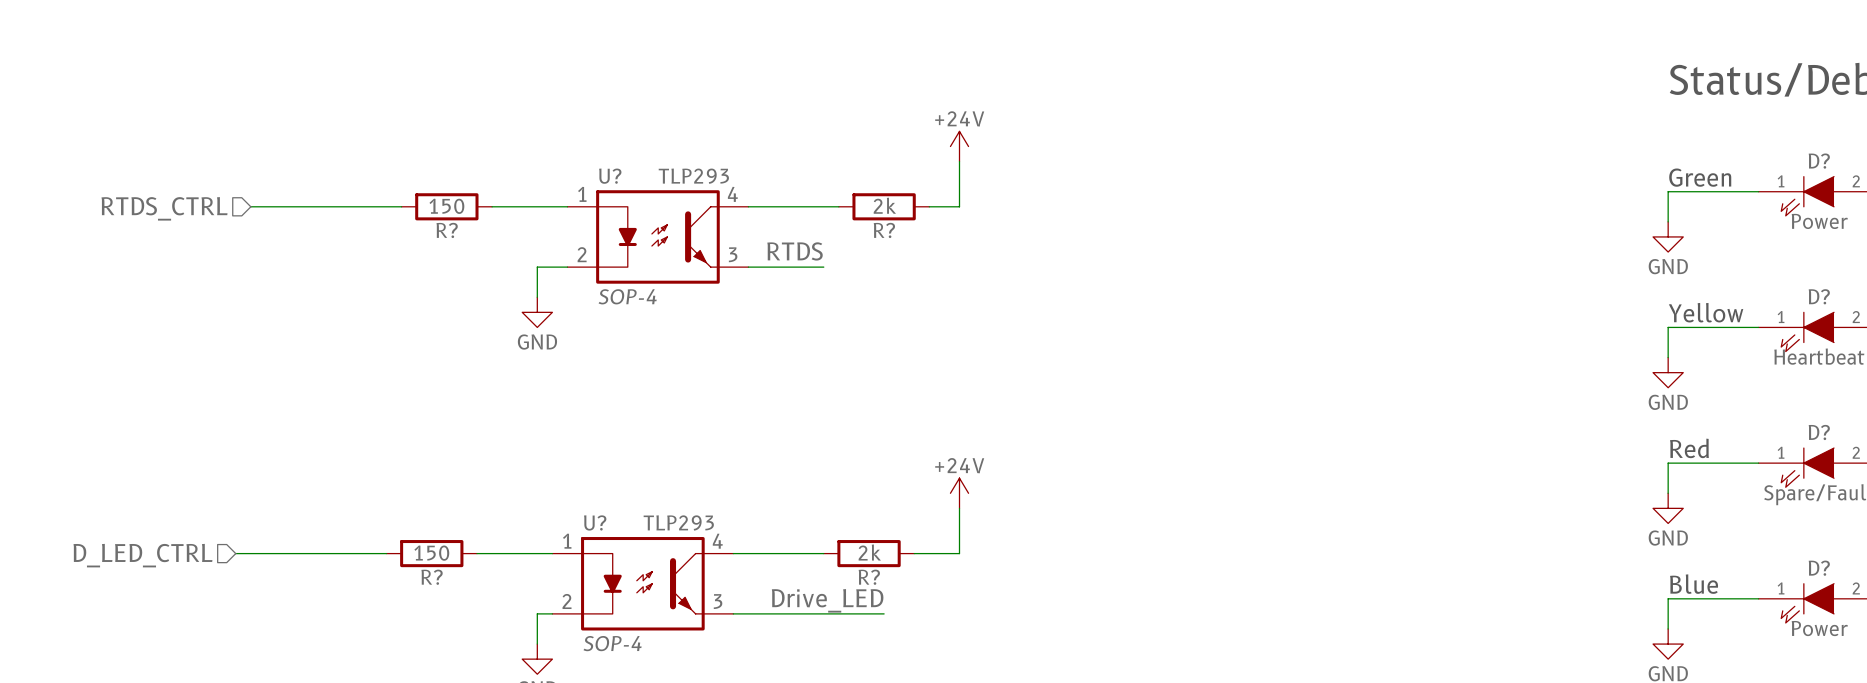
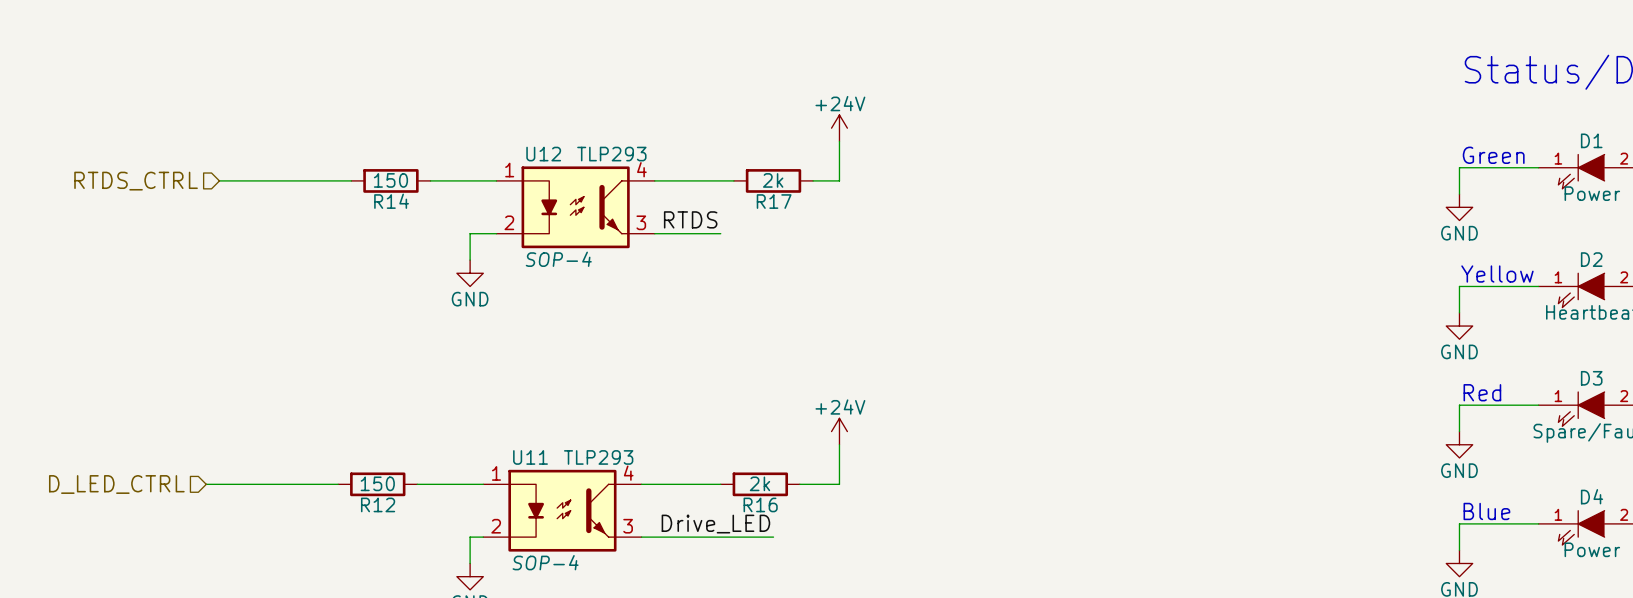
D? name: D? (1819, 161) -> D1 (1591, 140)
U? name: U? (610, 176) -> U12 (543, 154)
R? name: R? (447, 230) -> R14 (391, 201)
R? name: R? (884, 230) -> R17 (774, 201)
D? name: D? (1819, 296) -> D2 (1591, 259)
D? name: D? (1819, 432) -> D3 (1591, 378)
U? name: U? (595, 522) -> U11 (530, 457)
D? name: D? (1819, 568) -> D4 (1592, 496)
R? name: R? (432, 577) -> R12 (378, 504)
R? name: R? (869, 577) -> R16 (760, 504)

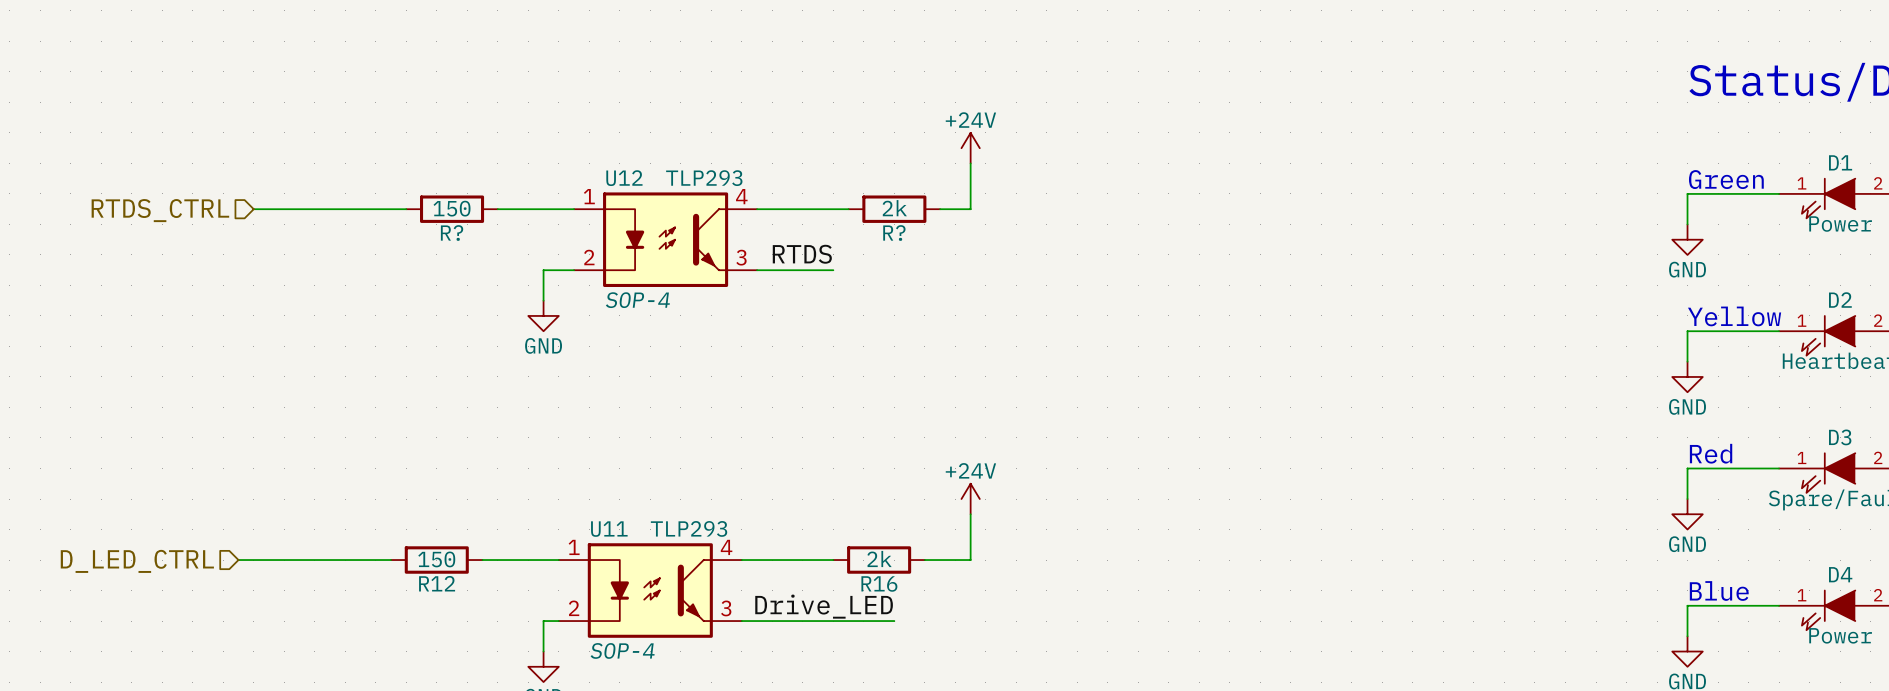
R14 name: R14 (391, 201) -> R? (452, 233)
R17 name: R17 (774, 201) -> R? (894, 233)

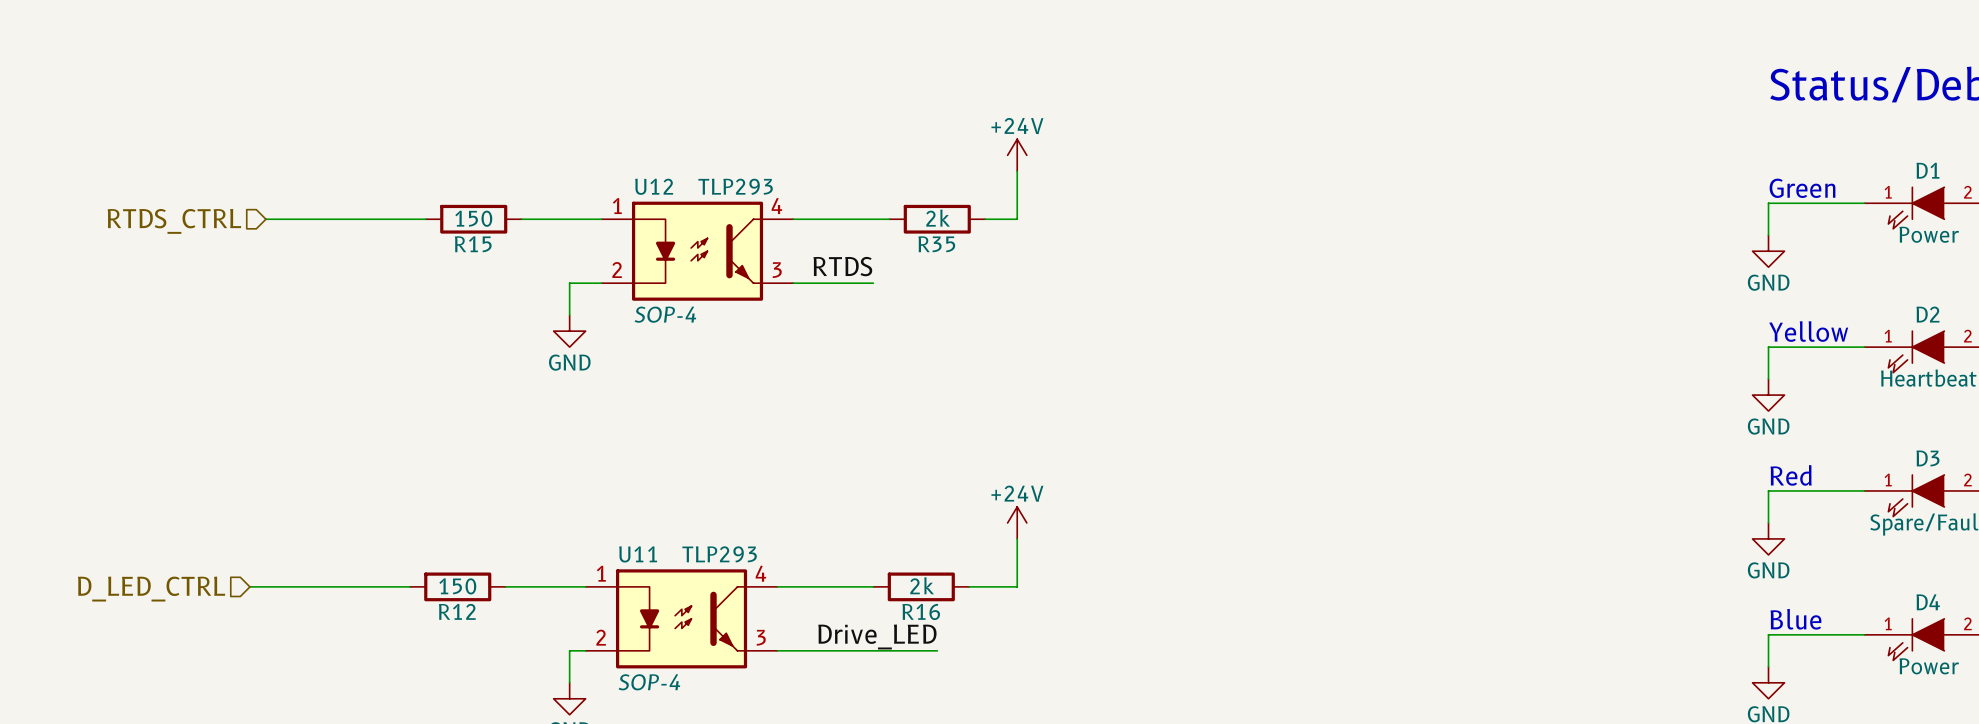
R? name: R? (452, 233) -> R15 (473, 244)
R? name: R? (894, 233) -> R35 (936, 244)

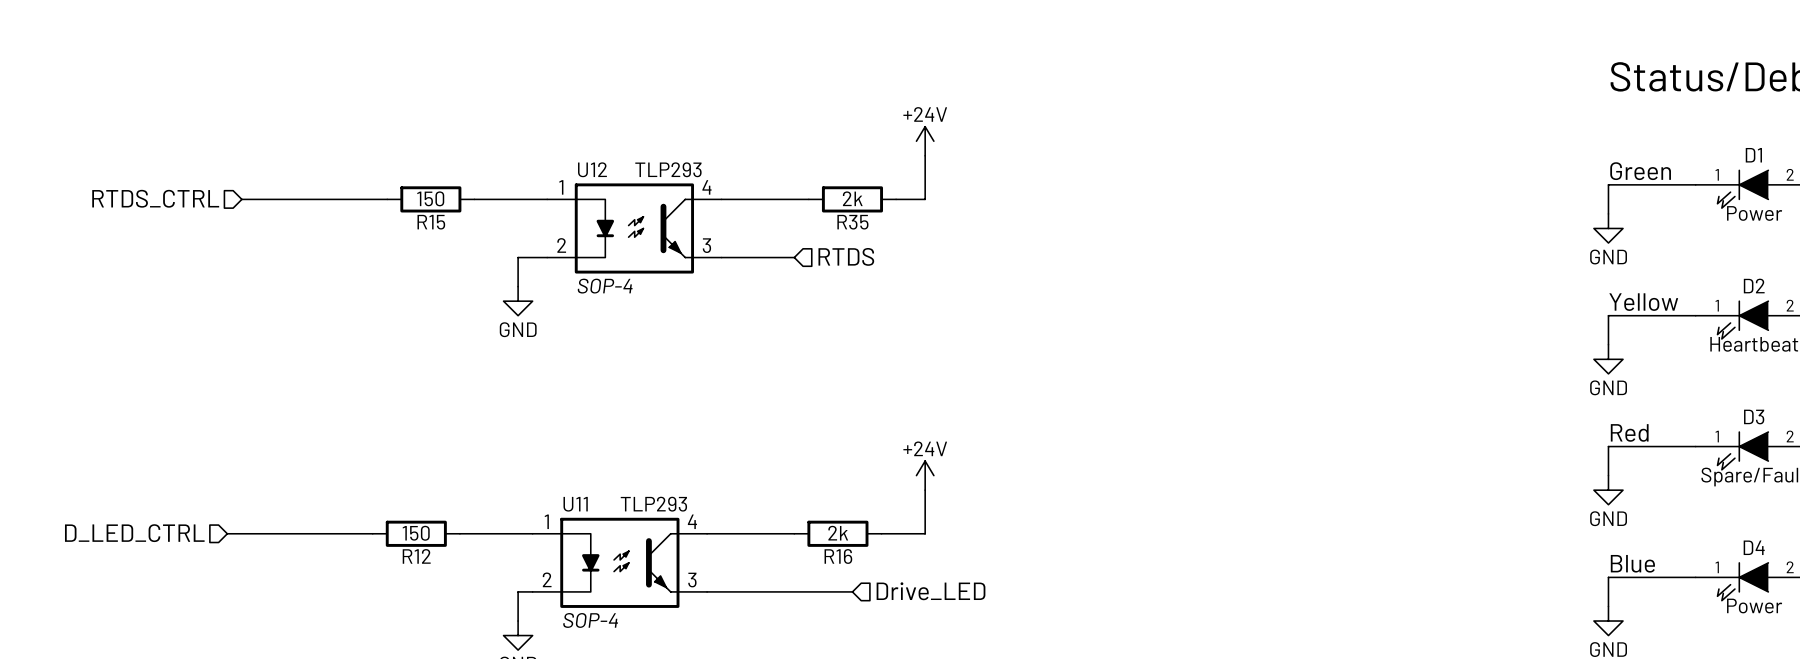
label: RTDS (842, 266) -> none
hierarchical label: none -> RTDS (846, 256)
label: Drive_LED (877, 636) -> none
hierarchical label: none -> Drive_LED (931, 591)

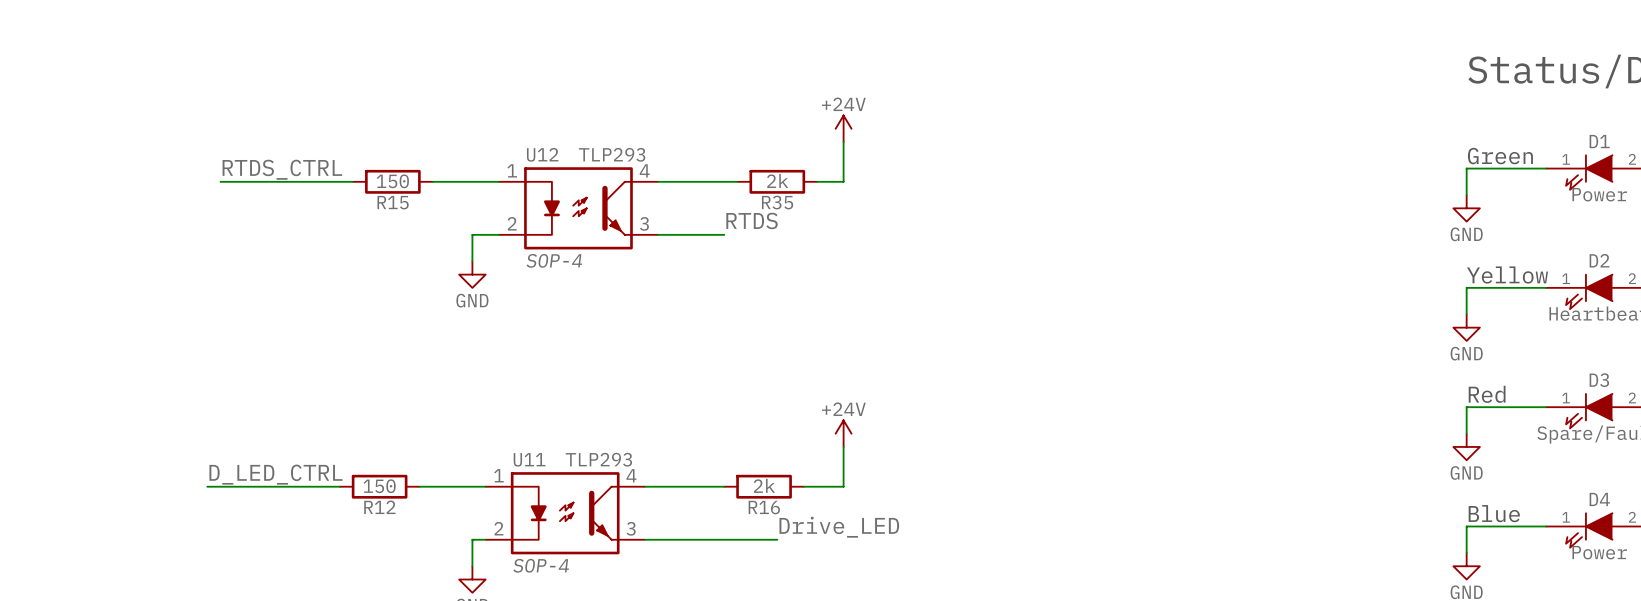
label: none -> RTDS_CTRL (282, 169)
hierarchical label: RTDS_CTRL (155, 198) -> none
label: none -> RTDS (752, 220)
hierarchical label: RTDS (846, 256) -> none
label: none -> D_LED_CTRL (276, 474)
hierarchical label: D_LED_CTRL (134, 533) -> none
label: none -> Drive_LED (839, 527)
hierarchical label: Drive_LED (931, 591) -> none

